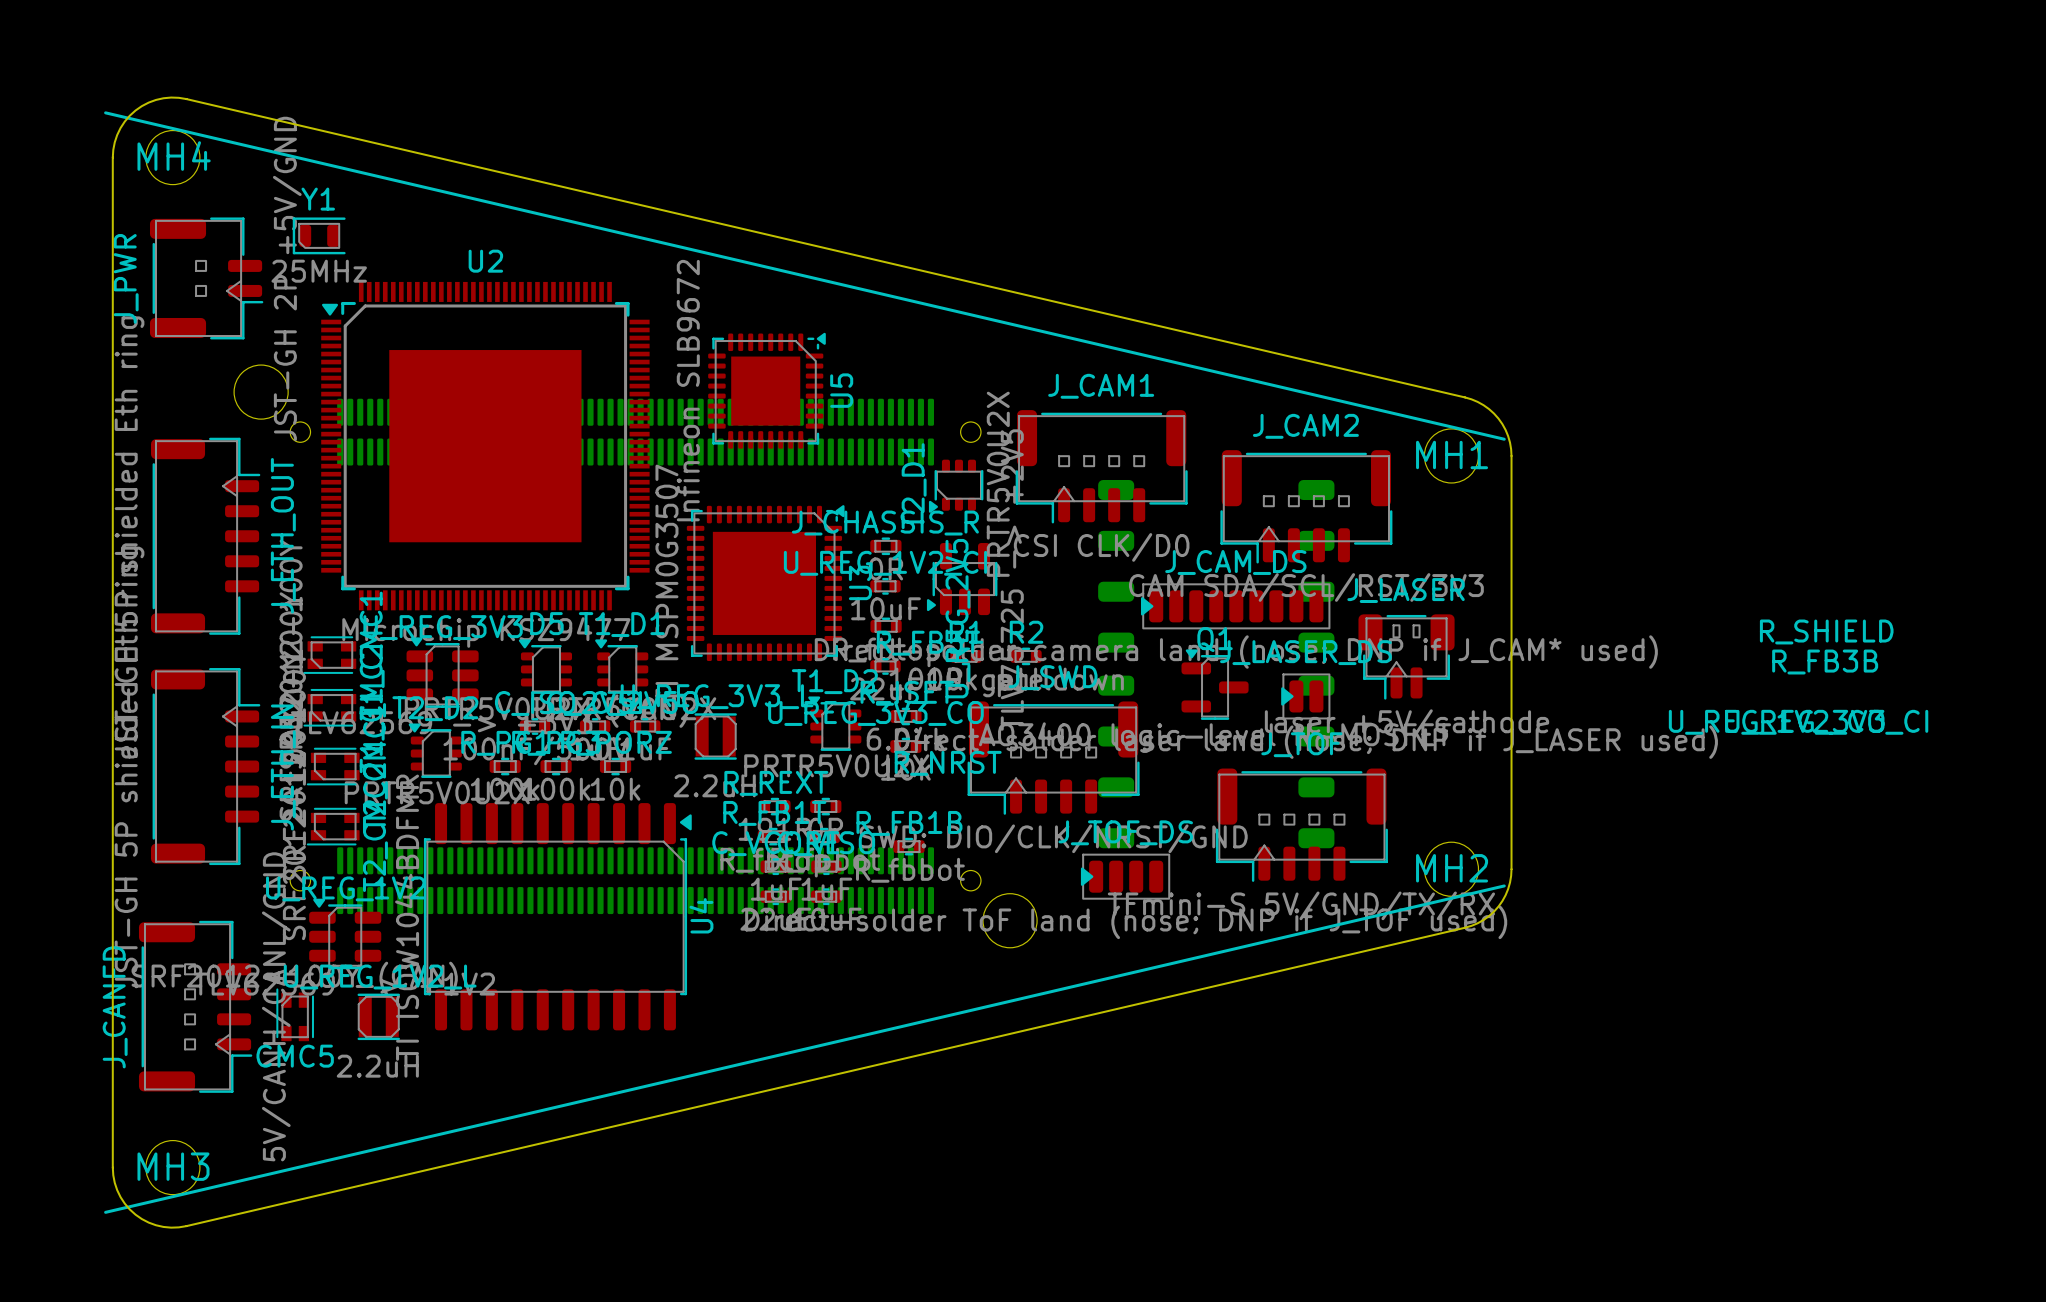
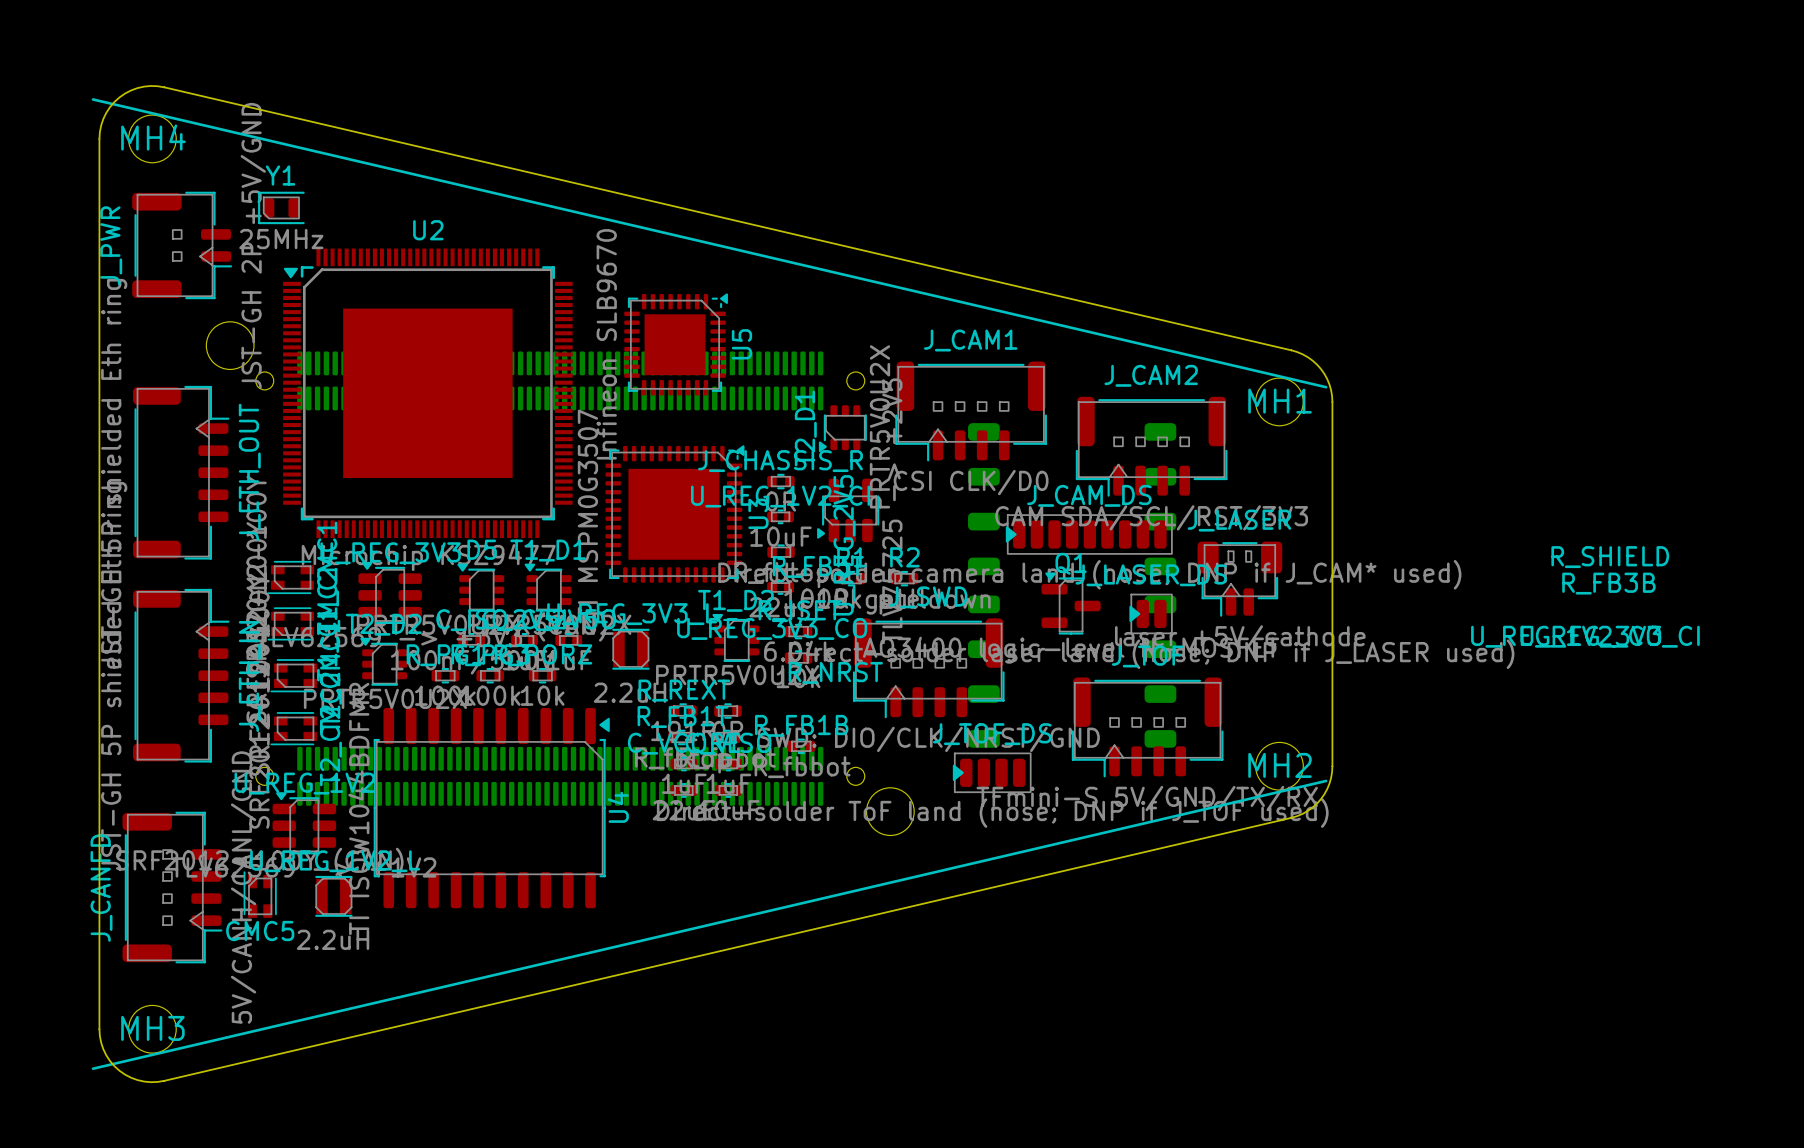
U5 value: Infineon SLB9672 (688, 390) -> Infineon SLB9670 (606, 344)

